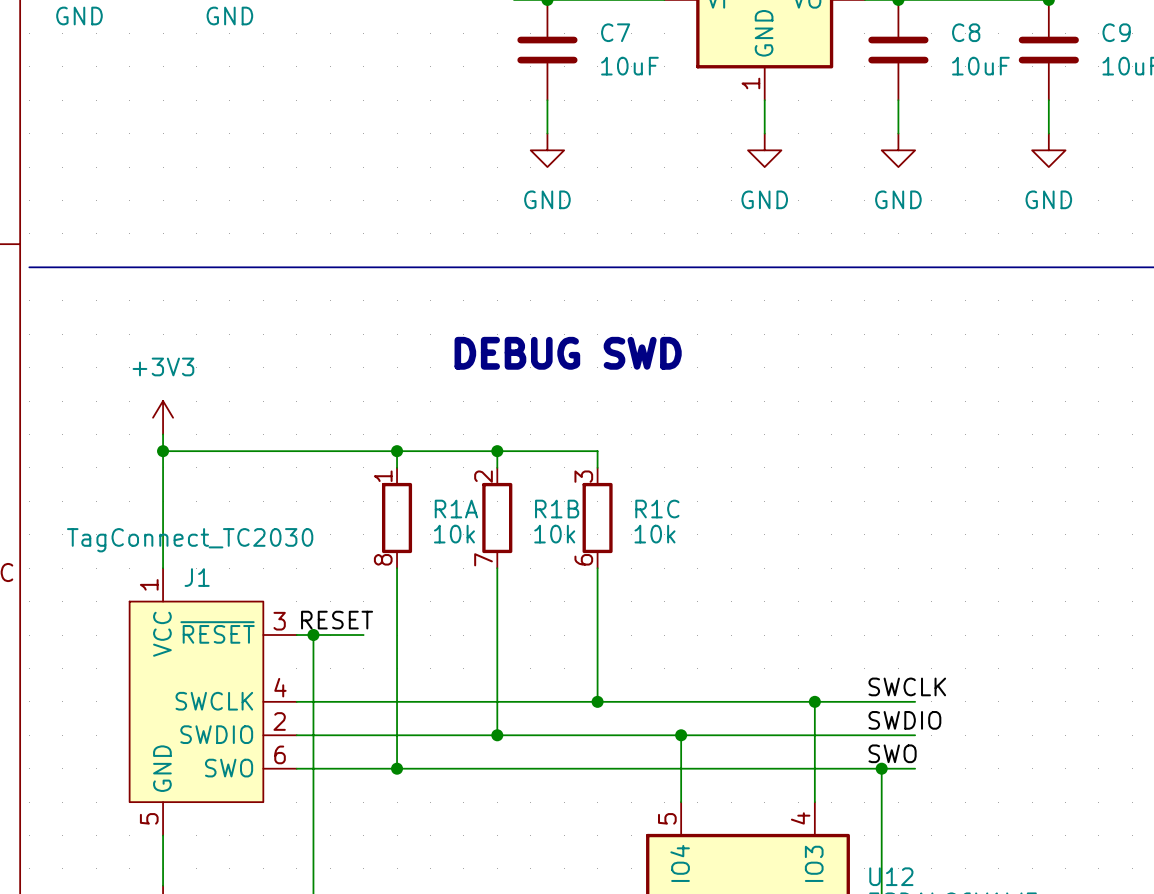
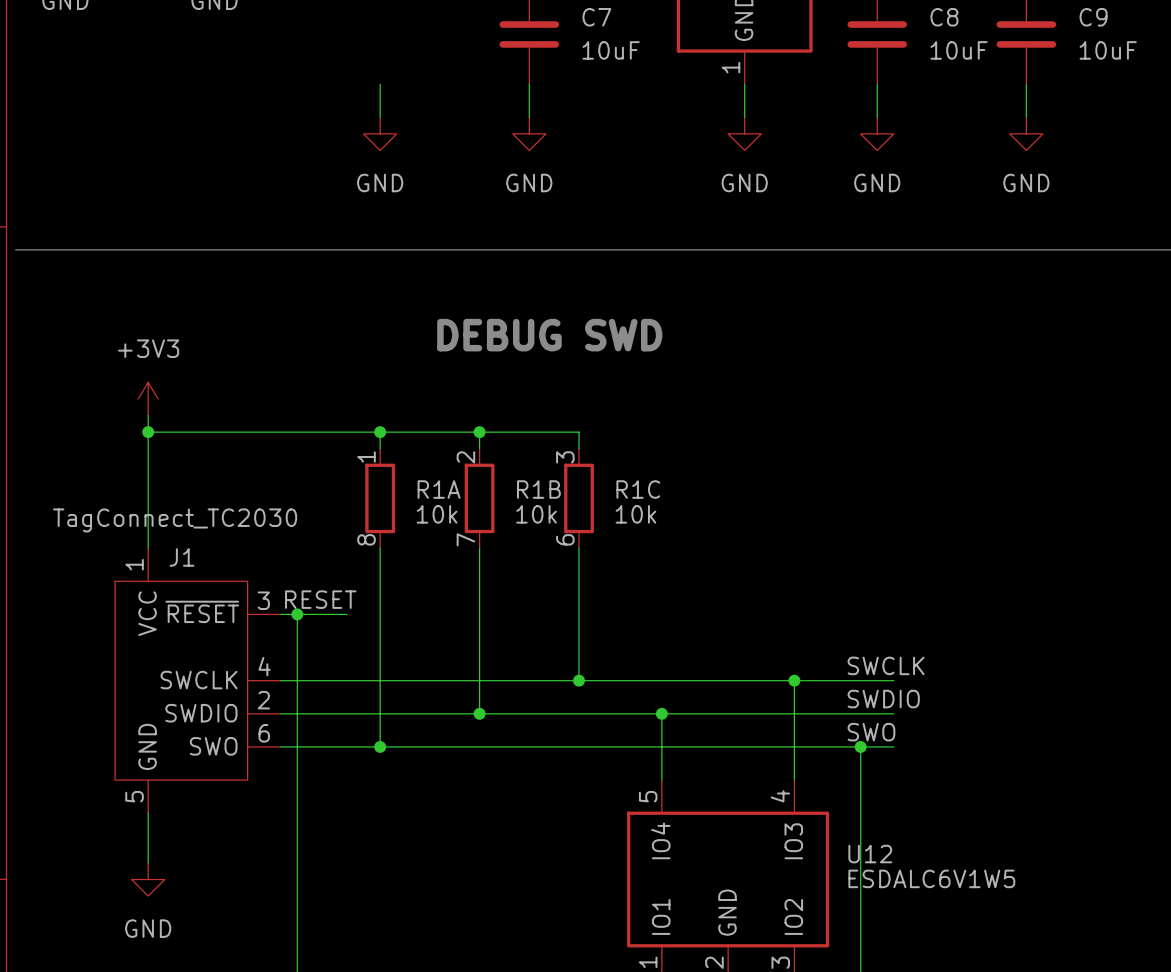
wire: none -> (380, 84) (380, 117)
power symbol: none -> GND (380, 133)

